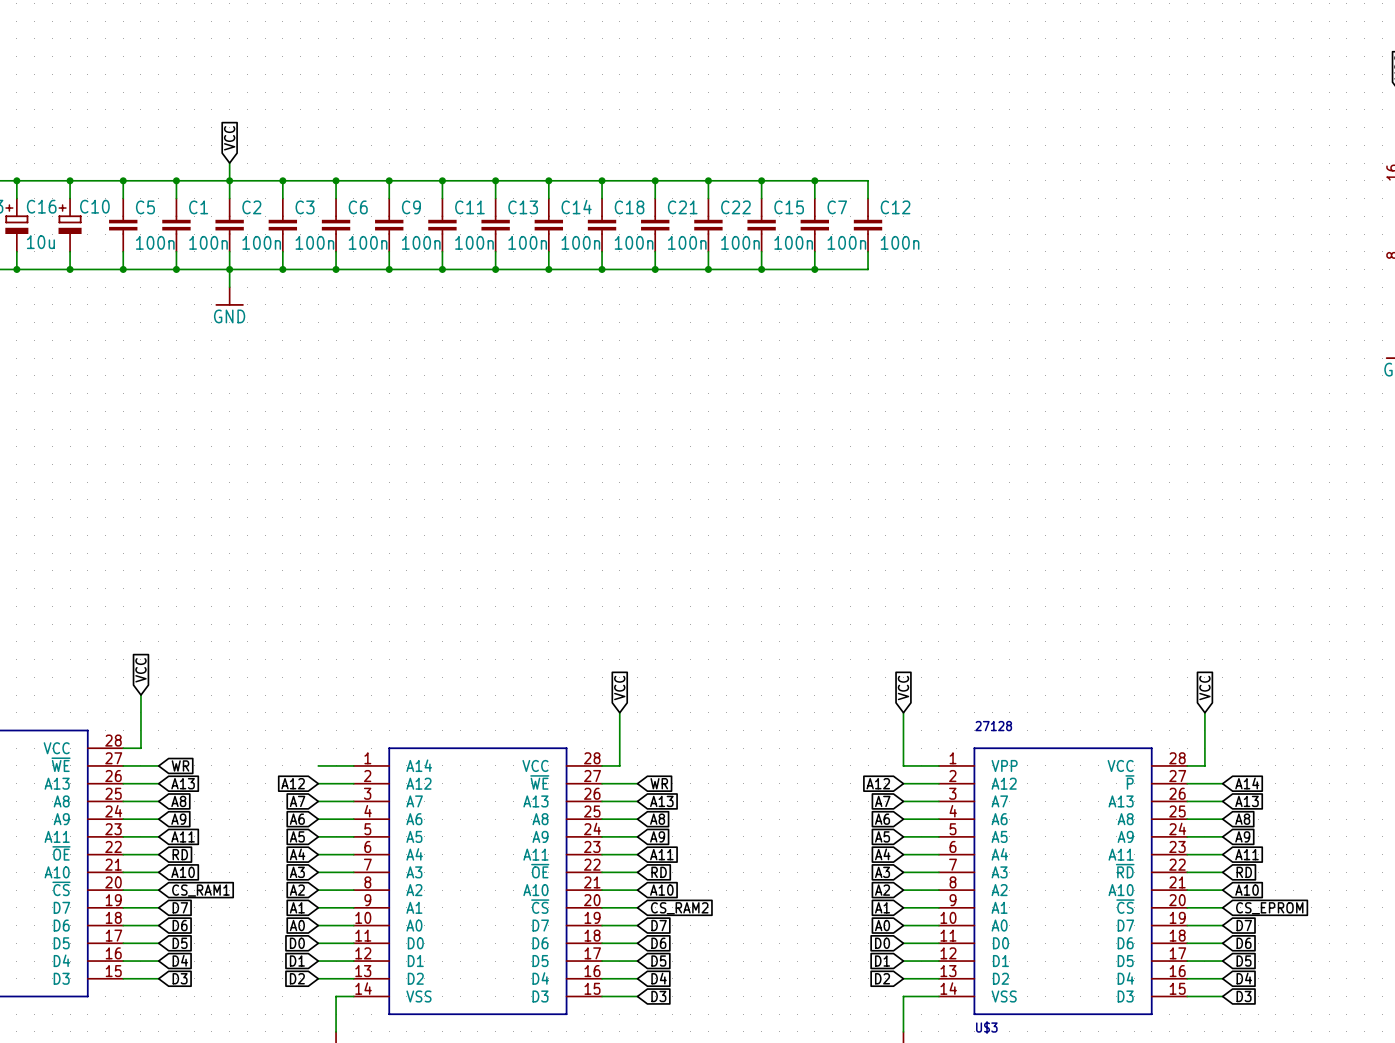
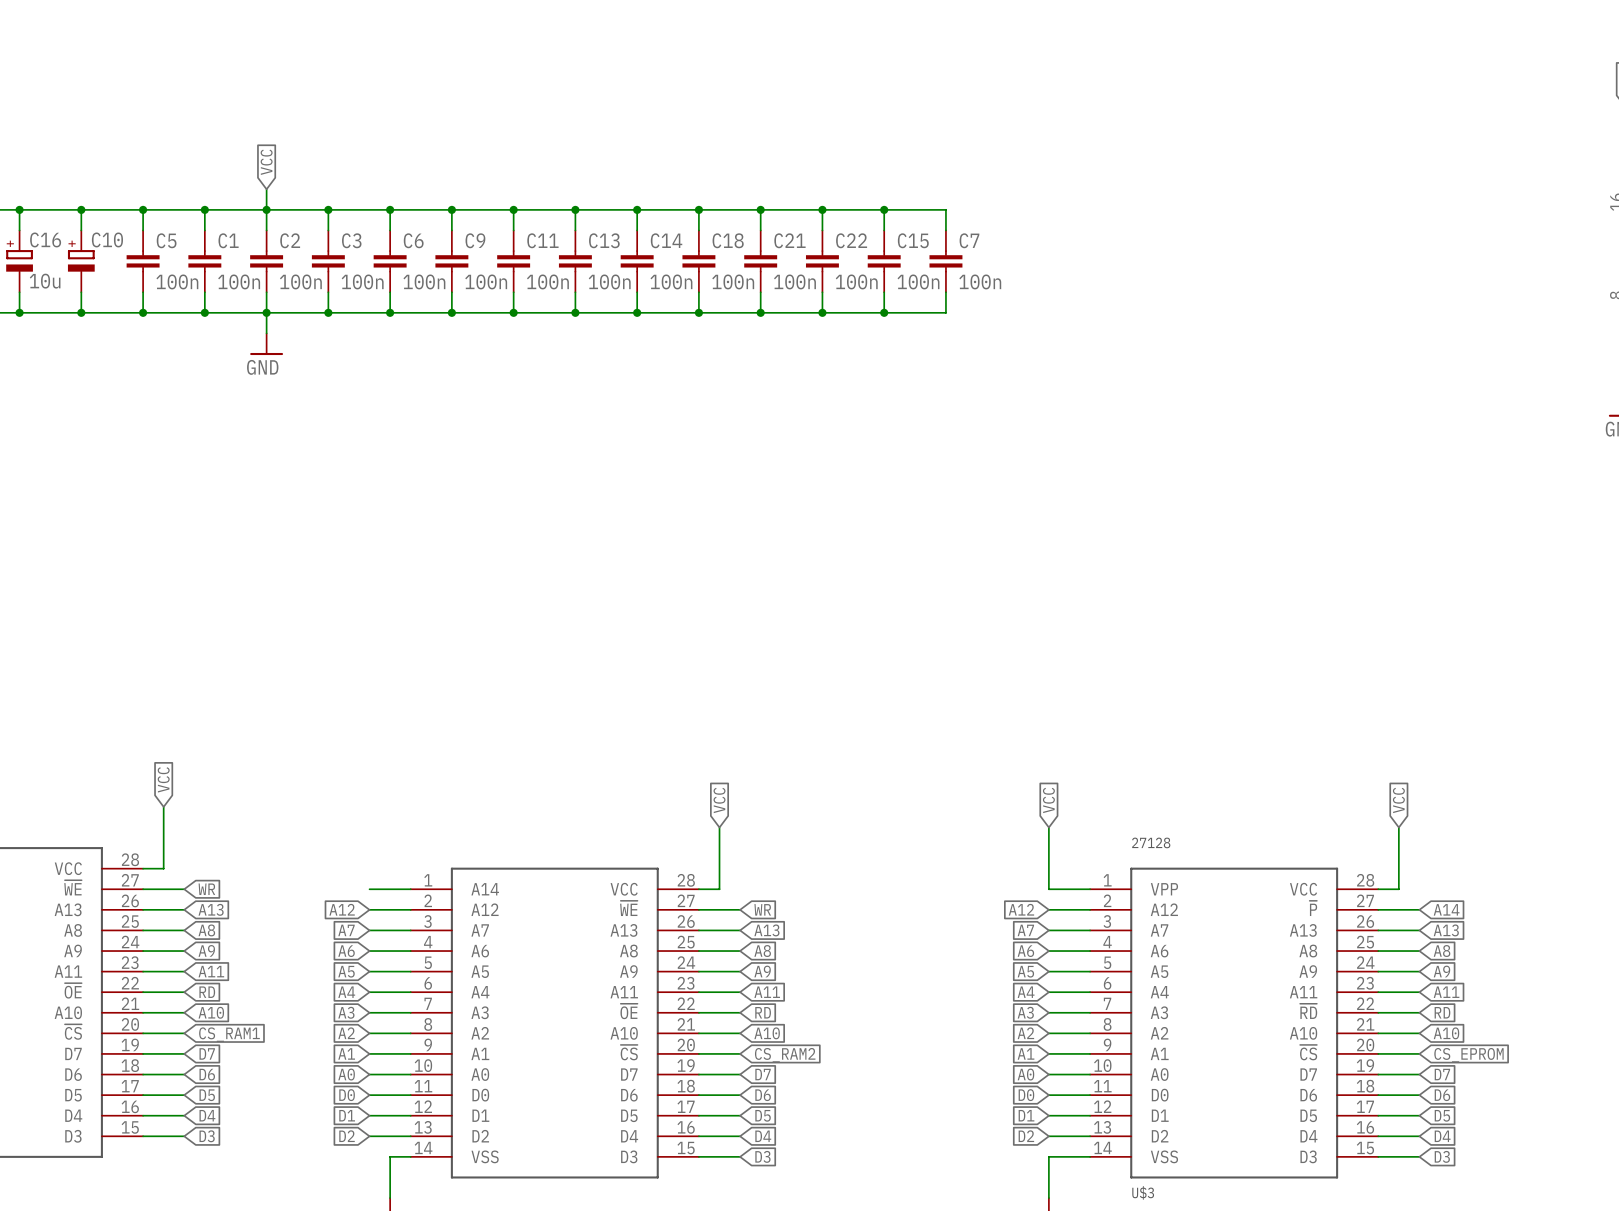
wire: (814, 180) (868, 180) (868, 198) -> none
junction: (814, 180) -> none
C12: 100n (868, 225) -> none
wire: (868, 251) (868, 269) (814, 269) -> none
junction: (814, 269) -> none

